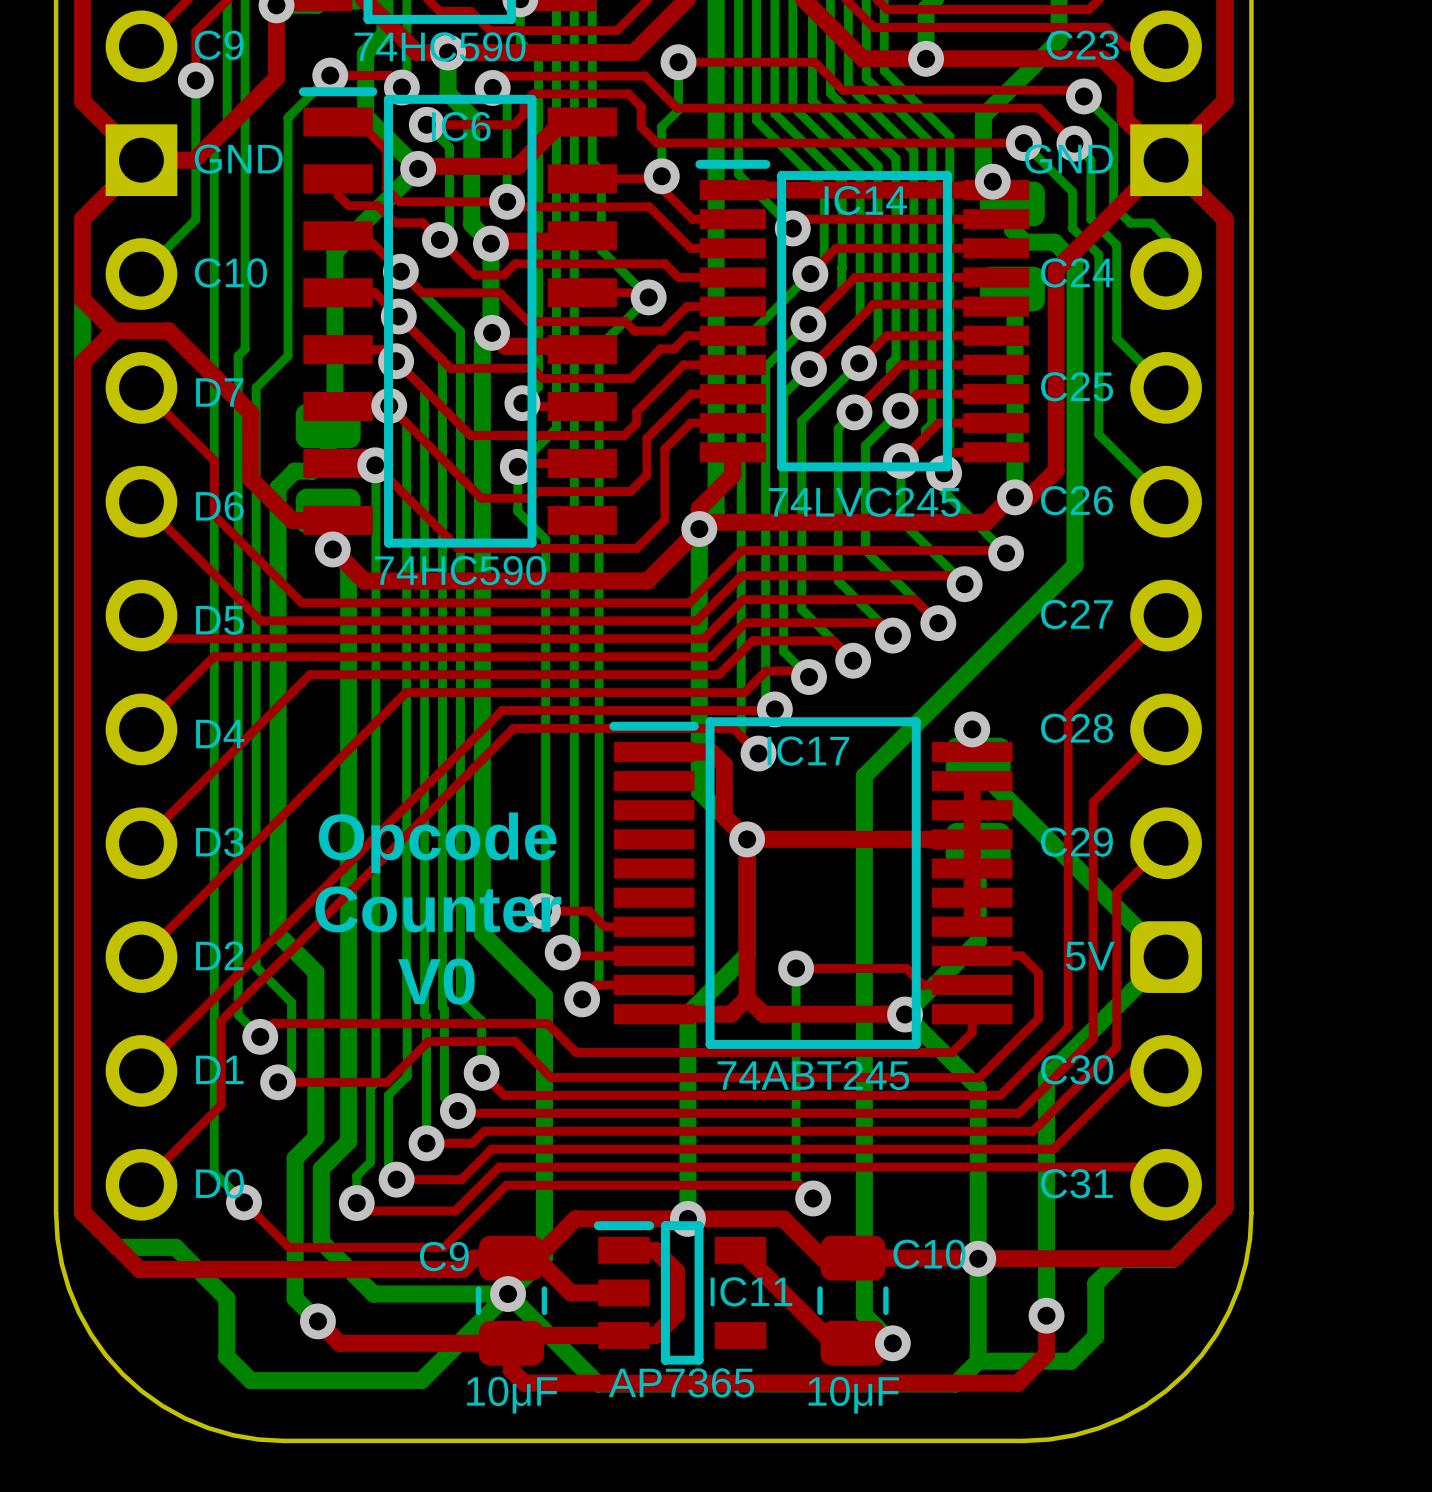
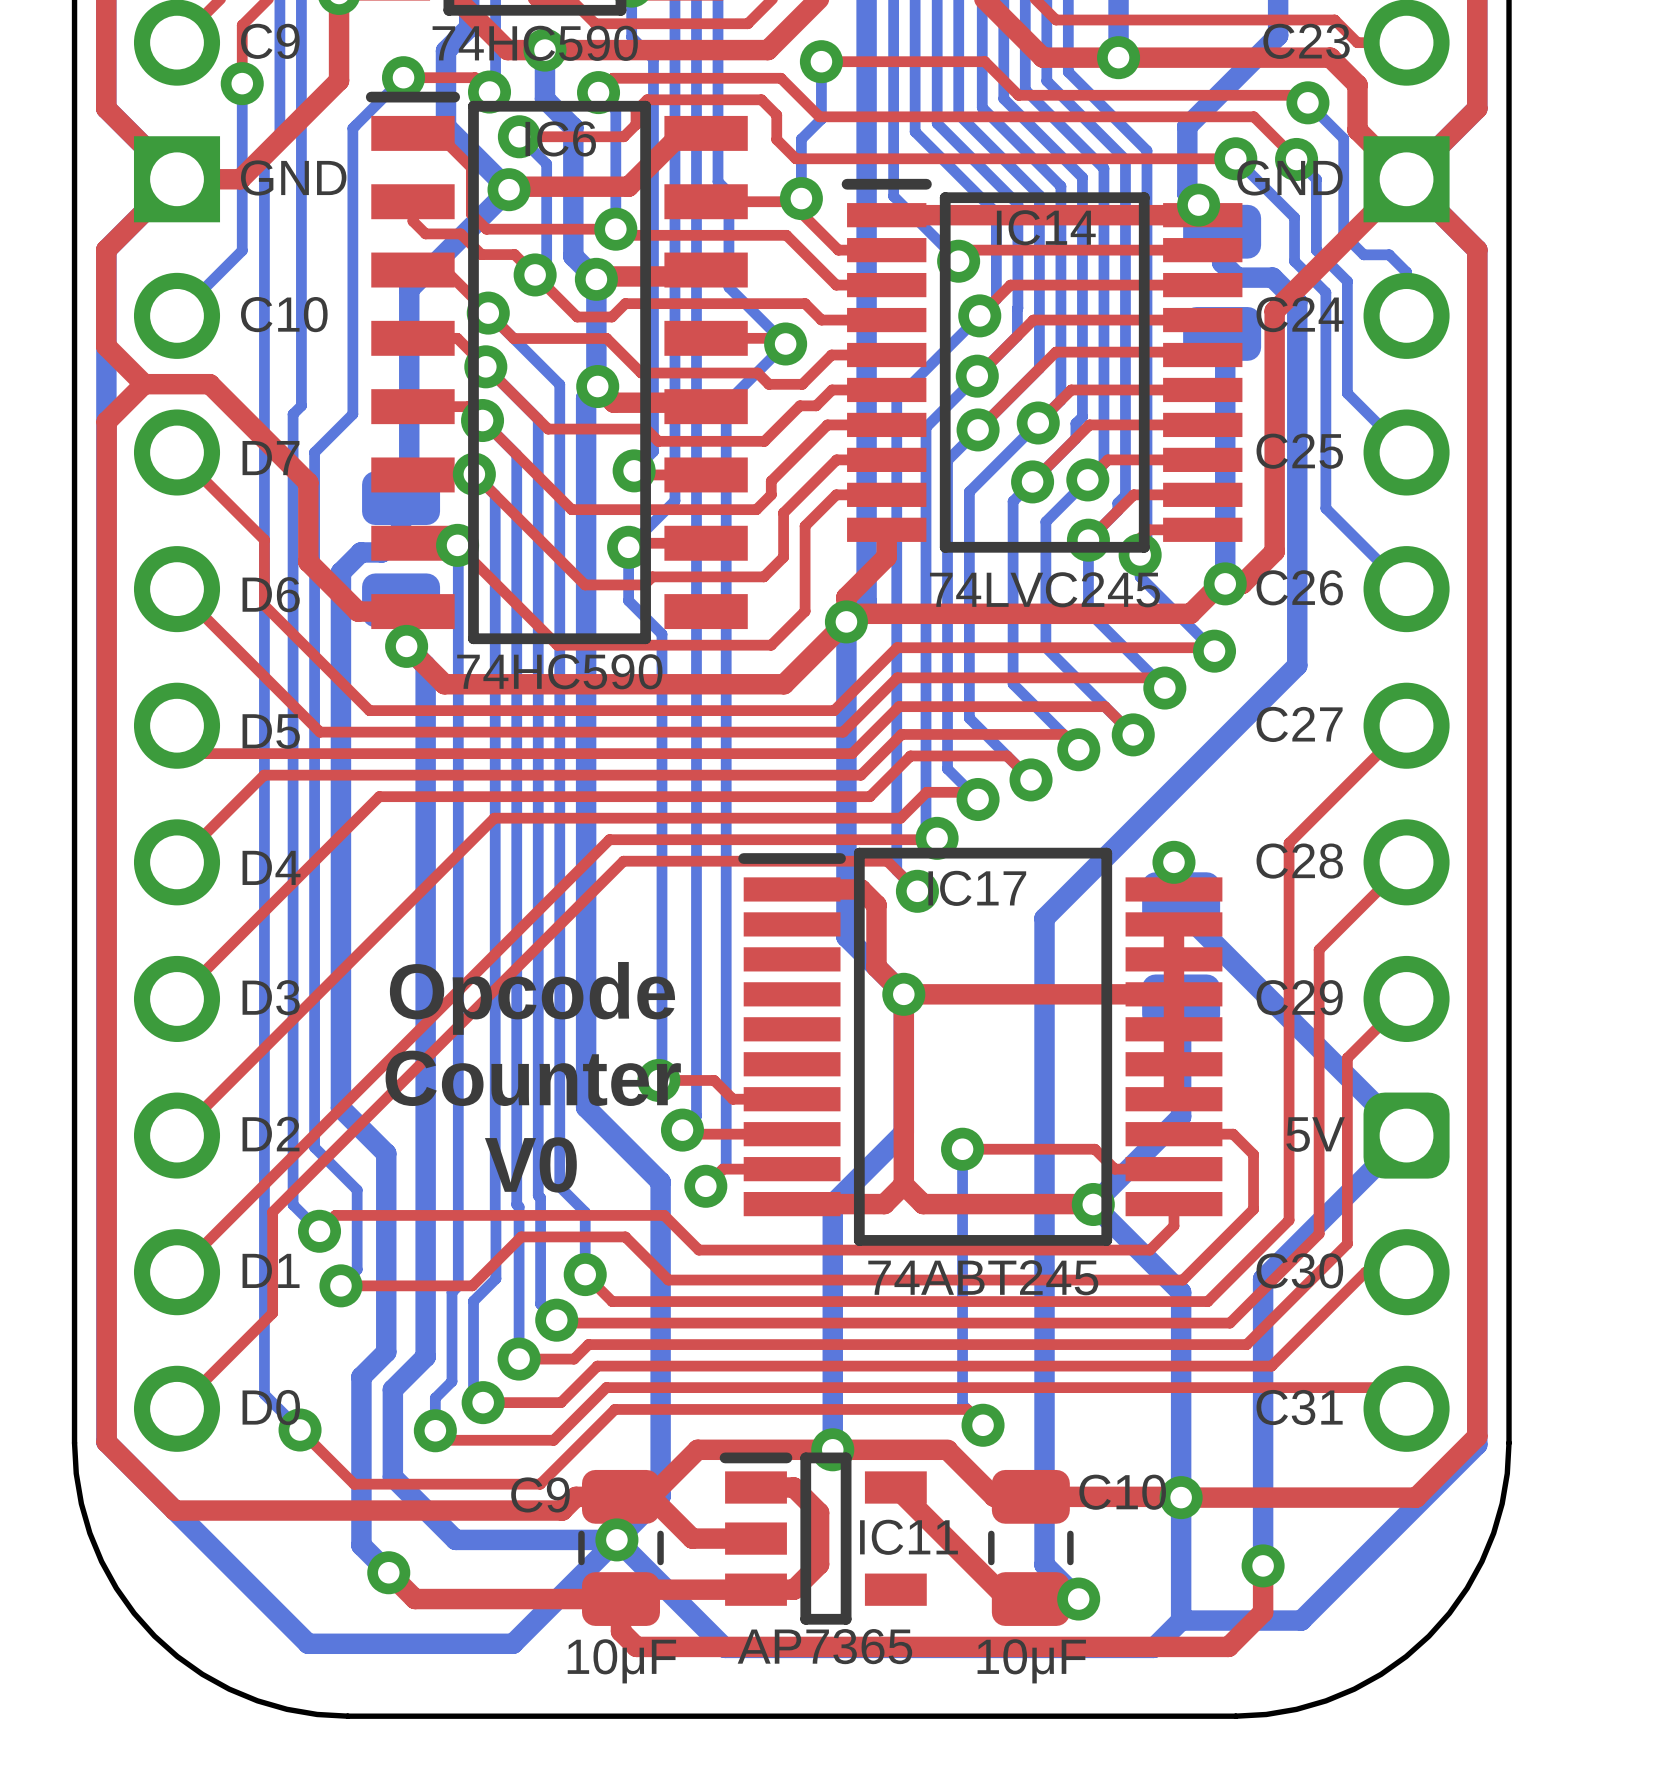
bottom track: (1225, 1207) (1172, 1259) (1119, 1259) (1095, 1283) (1095, 1336) (1071, 1361) -> (1477, 1435) (1477, 1444) (1301, 1620) (1292, 1620)
bottom track: (117, 1247) (175, 1247) (226, 1298) (226, 1356) -> (148, 1483) (279, 1615)

